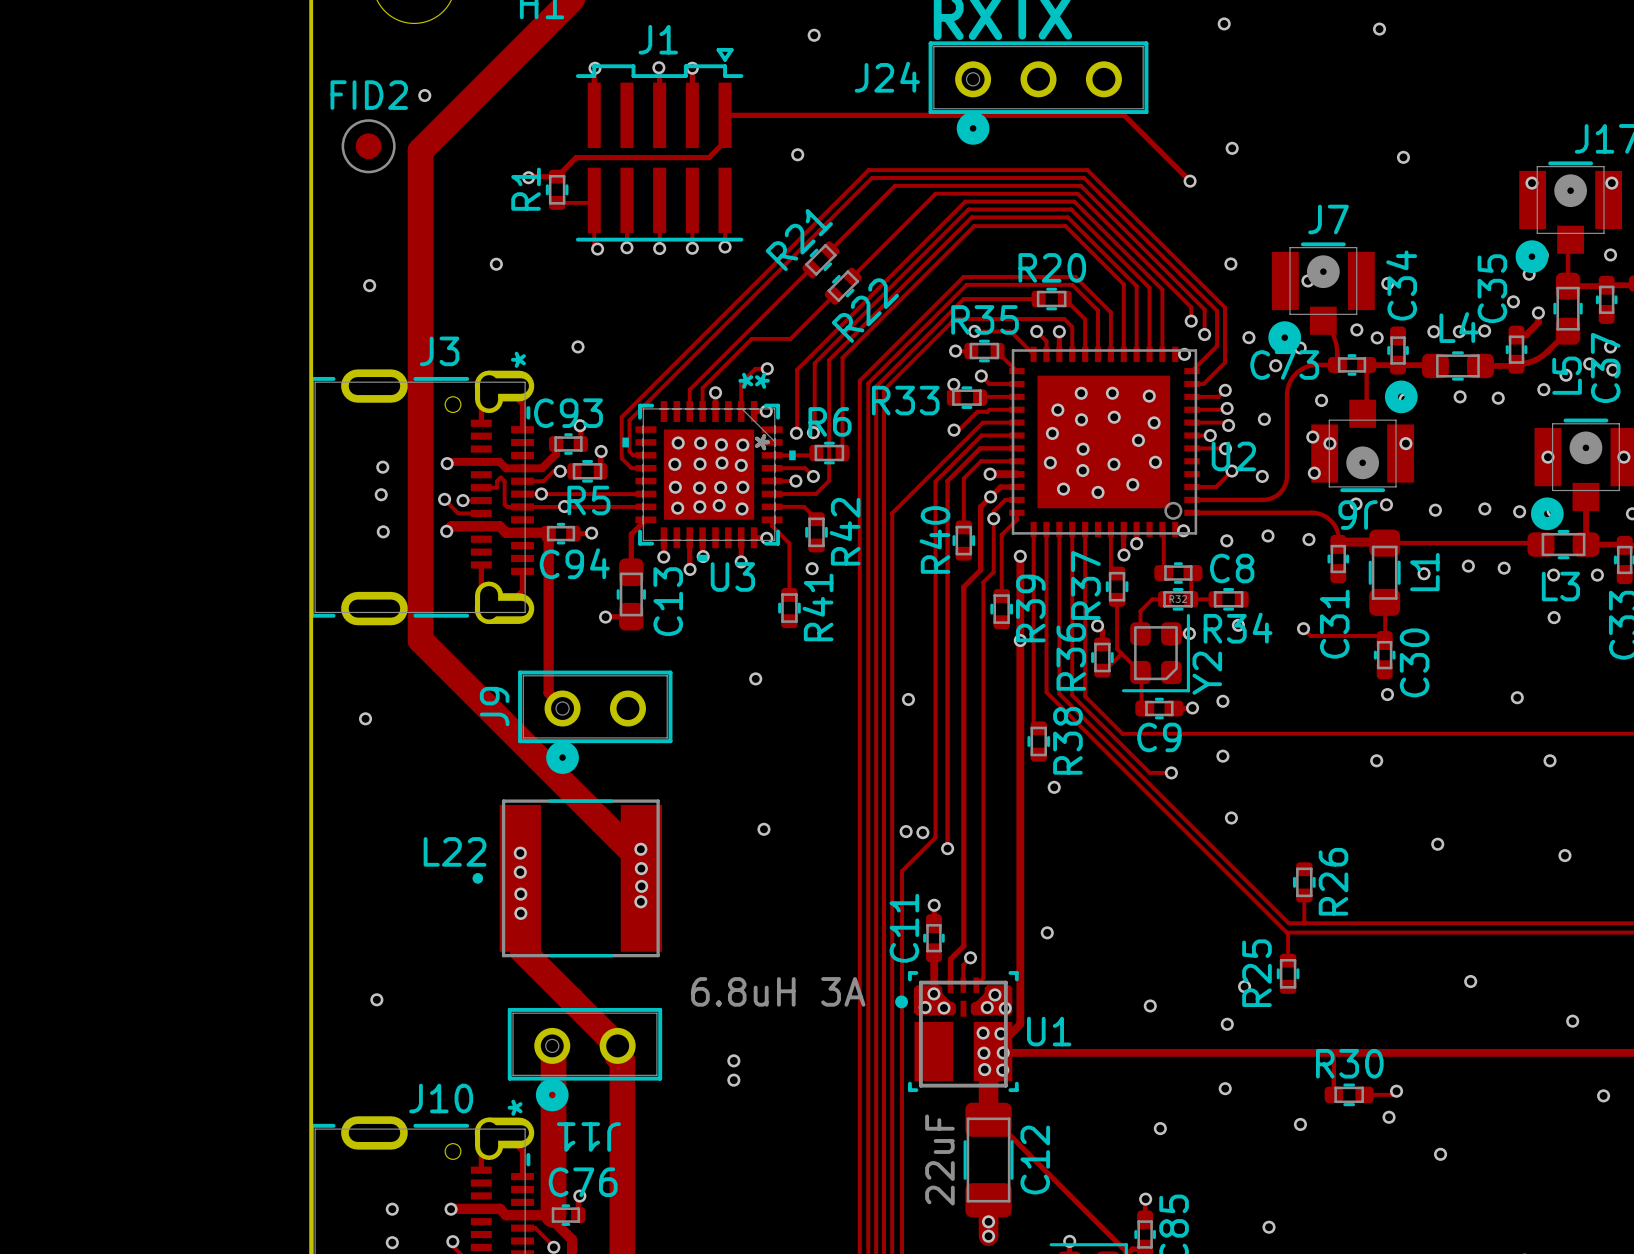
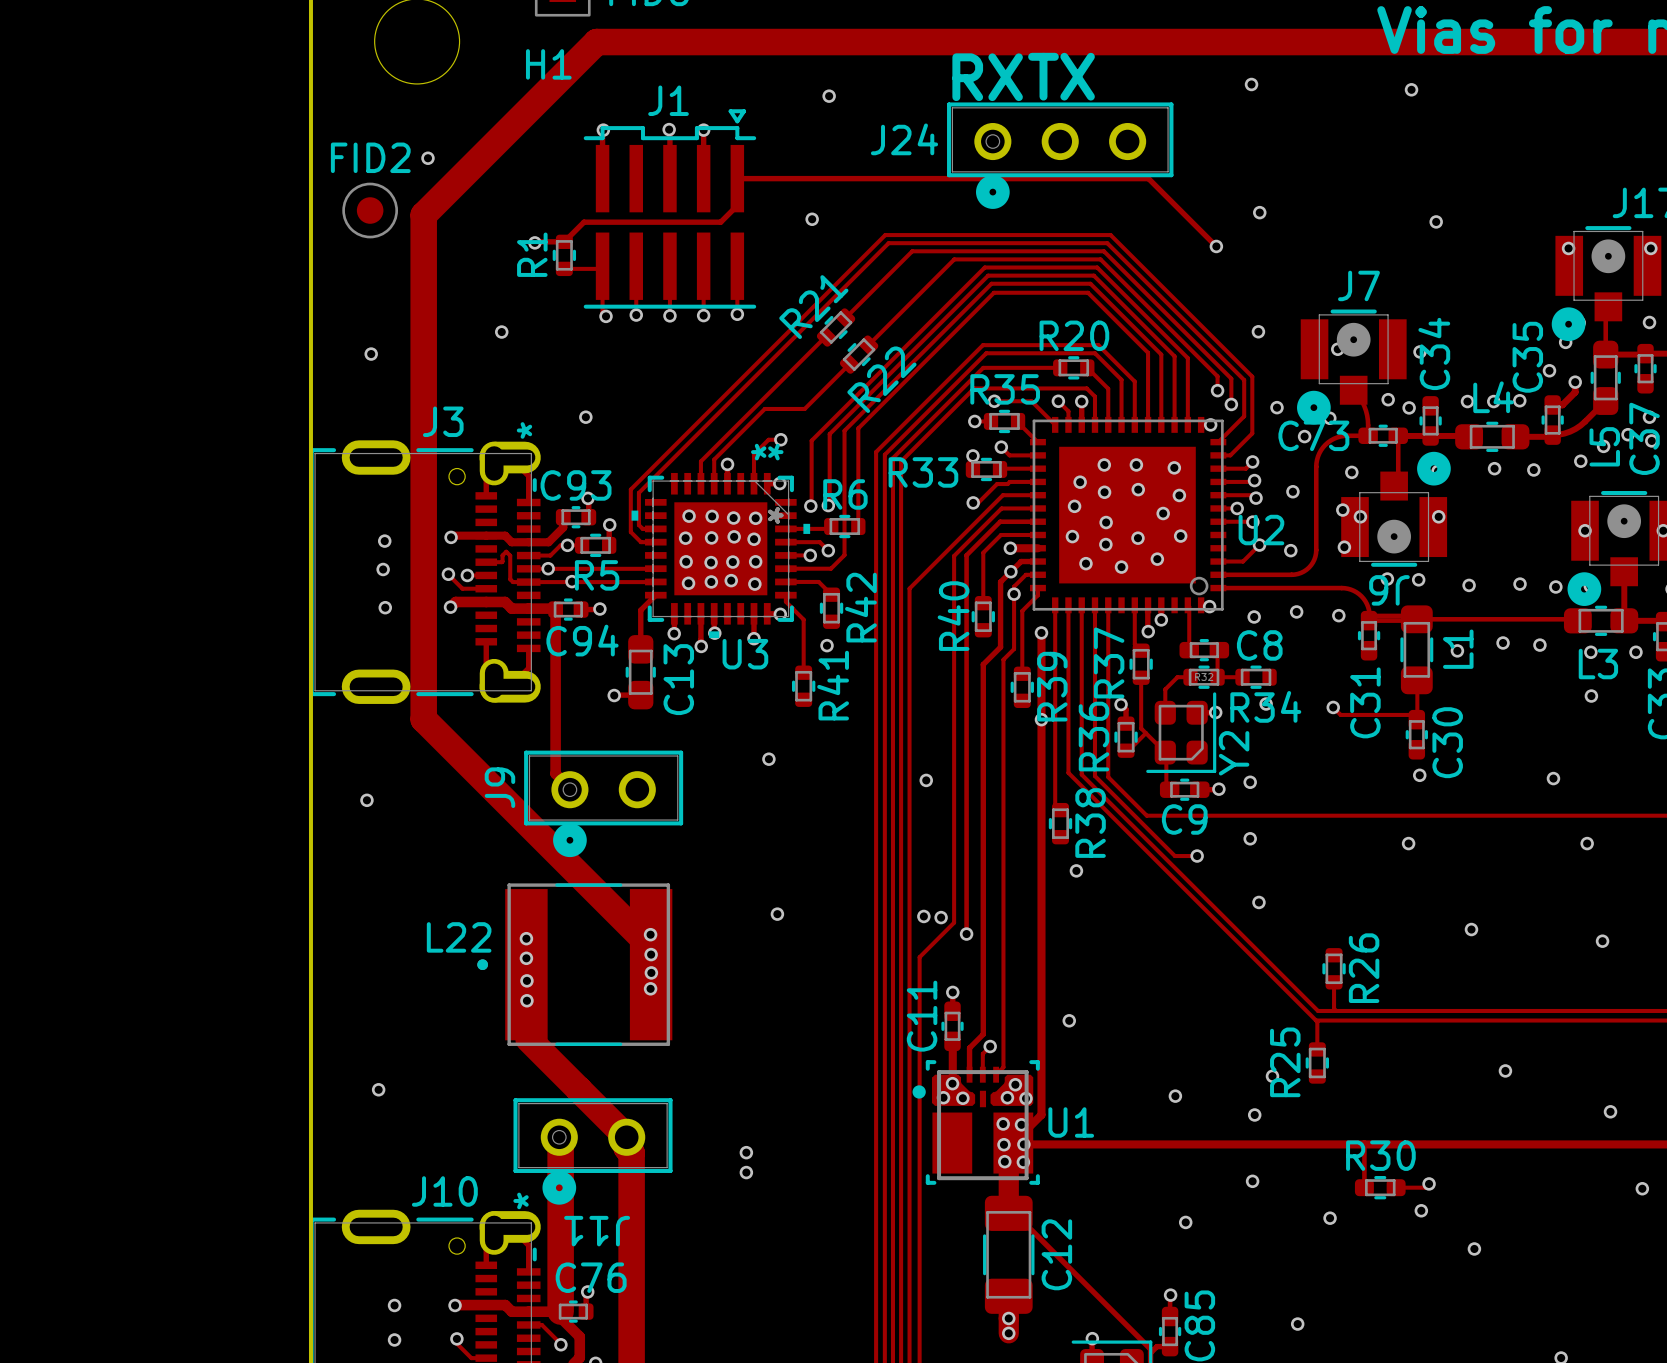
L22 value: 6.8uH 3A (778, 991) -> none
C12 value: 22uF (939, 1160) -> none

